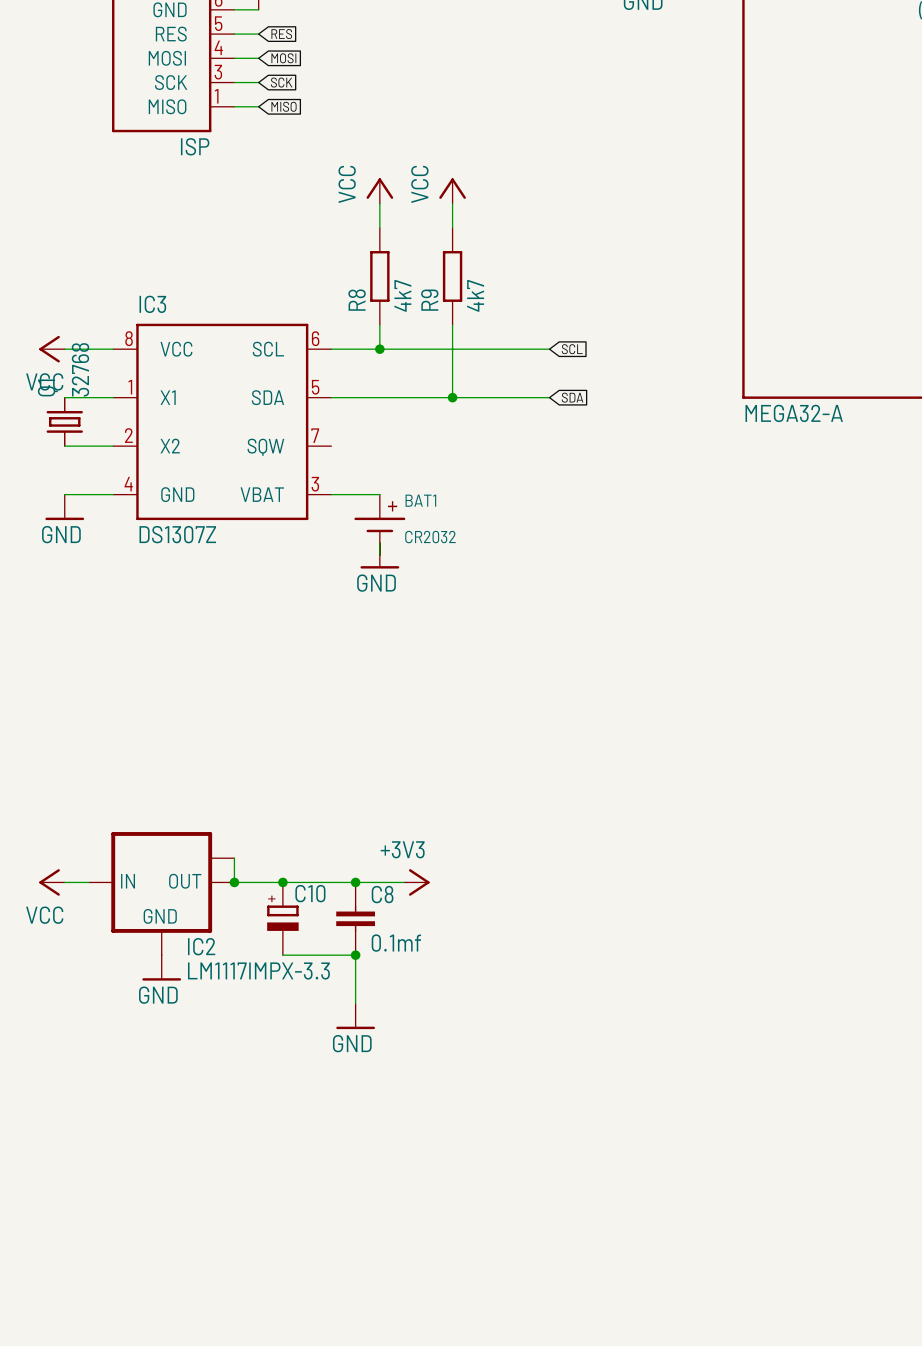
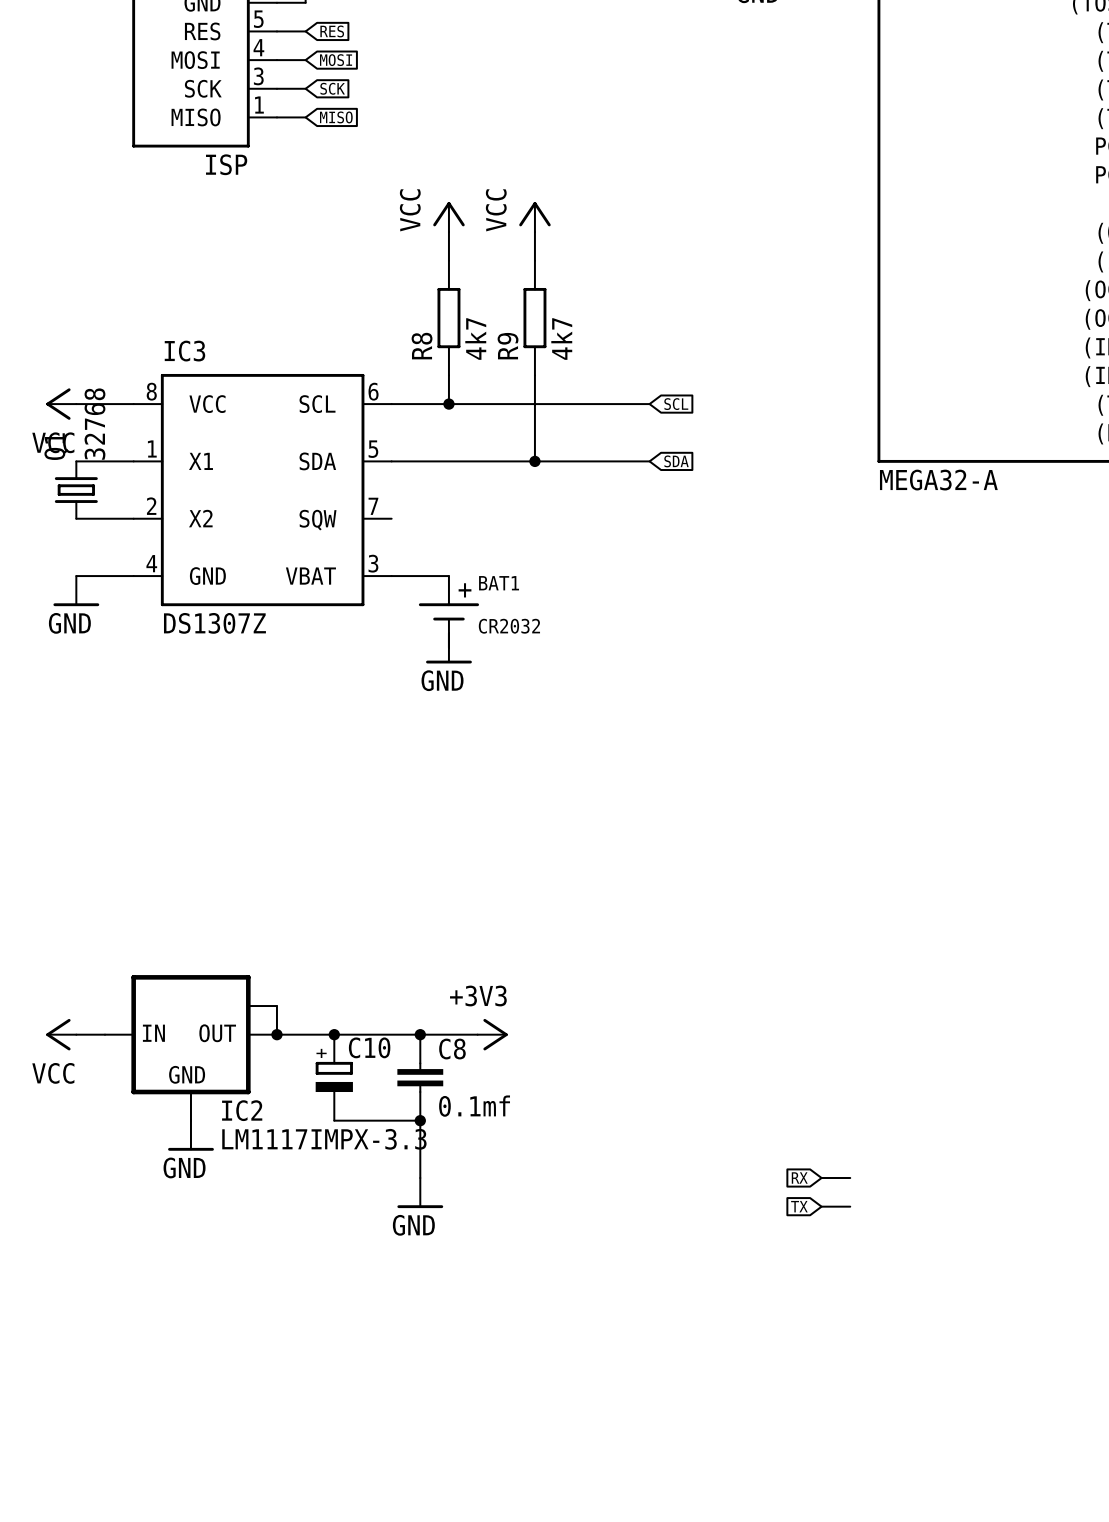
global label: none -> RX (799, 1178)
wire: none -> (821, 1178) (850, 1178)
global label: none -> TX (799, 1206)
wire: none -> (821, 1206) (850, 1206)

